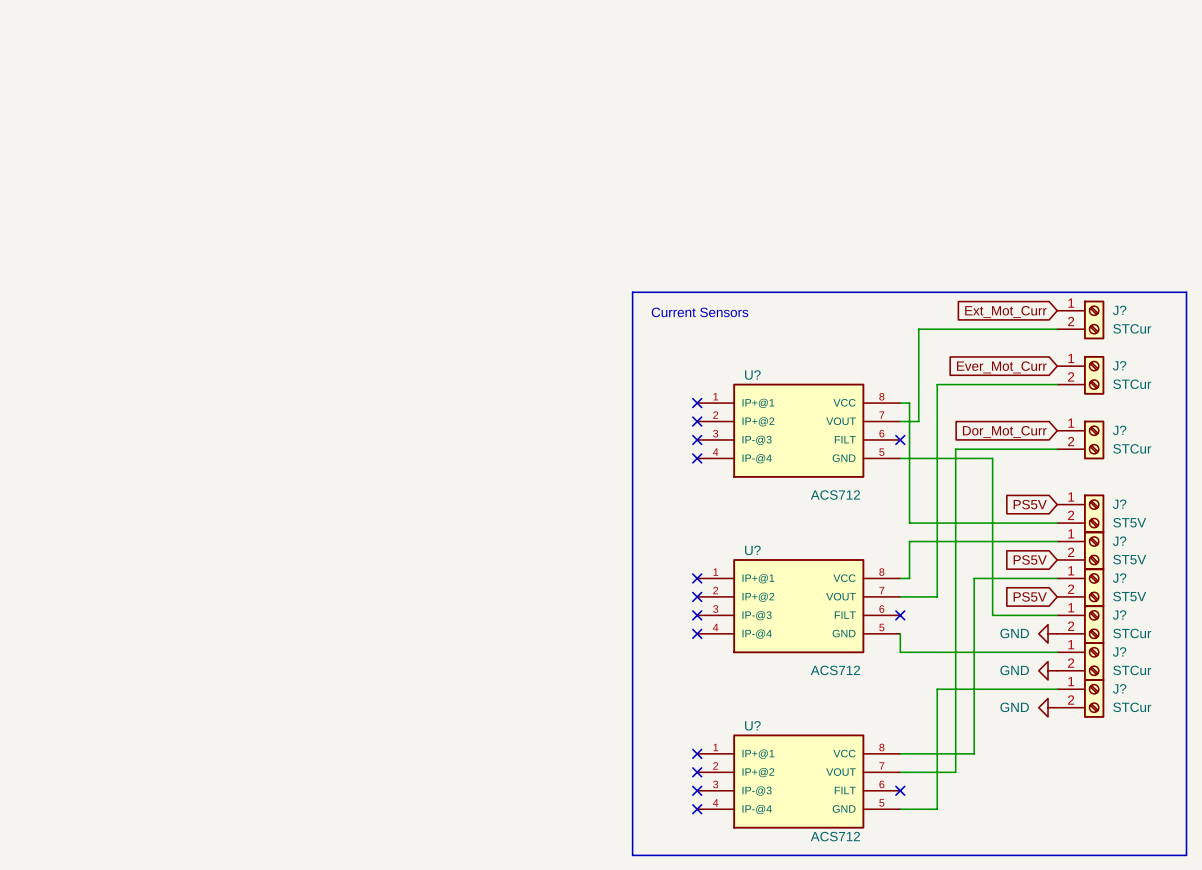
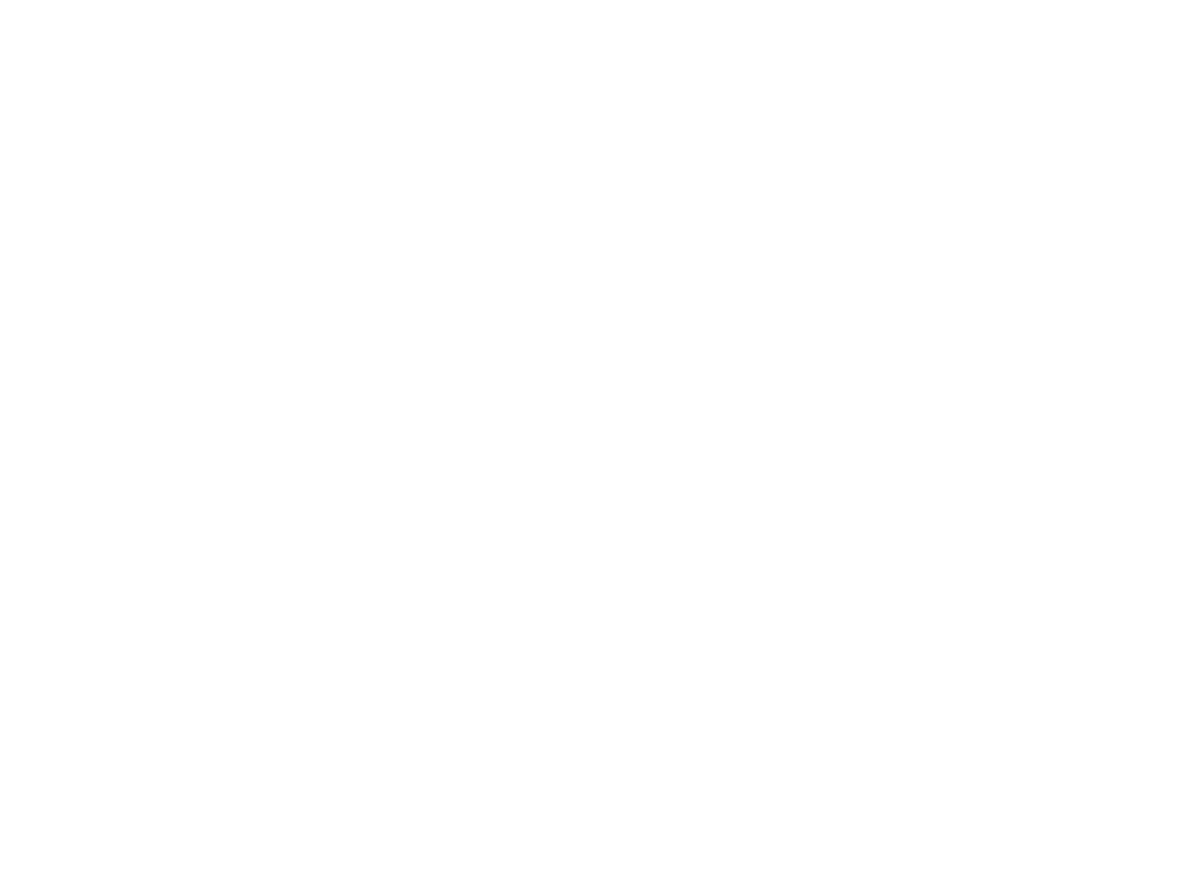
line: (632, 292) (632, 855) (1186, 855) (1186, 292) (632, 292) -> none
text: Current Sensors (700, 312) -> none
global label: Ext_Mot_Curr (1005, 312) -> none
J?: STCur (1080, 319) -> none
wire: (1057, 329) (918, 329) (918, 421) (900, 421) -> none
global label: Ever_Mot_Curr (1001, 367) -> none
J?: STCur (1080, 375) -> none
wire: (1057, 384) (937, 384) (937, 596) (900, 596) -> none
no-connect mark: (697, 403) -> none
wire: (900, 403) (909, 403) (909, 523) (1057, 523) -> none
no-connect mark: (697, 421) -> none
U?: ACS712 (798, 430) -> none
global label: Dor_Mot_Curr (1004, 432) -> none
no-connect mark: (697, 439) -> none
no-connect mark: (900, 439) -> none
J?: STCur (1080, 439) -> none
wire: (1057, 449) (955, 449) (955, 772) (900, 772) -> none
no-connect mark: (697, 458) -> none
wire: (900, 458) (992, 458) (992, 615) (1057, 615) -> none
global label: PS5V (1030, 504) -> none
J?: ST5V (1080, 513) -> none
wire: (1057, 541) (909, 541) (909, 578) (900, 578) -> none
J?: ST5V (1080, 550) -> none
global label: PS5V (1030, 559) -> none
no-connect mark: (697, 578) -> none
wire: (1057, 578) (974, 578) (974, 753) (900, 753) -> none
J?: ST5V (1080, 587) -> none
no-connect mark: (697, 596) -> none
global label: PS5V (1030, 596) -> none
U?: ACS712 (798, 606) -> none
no-connect mark: (697, 615) -> none
no-connect mark: (900, 615) -> none
J?: STCur (1080, 624) -> none
no-connect mark: (697, 633) -> none
wire: (900, 633) (900, 652) (1057, 652) -> none
power symbol: GND (1048, 633) -> none
J?: STCur (1080, 661) -> none
power symbol: GND (1048, 670) -> none
wire: (1057, 689) (937, 689) (937, 809) (900, 809) -> none
J?: STCur (1080, 698) -> none
power symbol: GND (1048, 707) -> none
no-connect mark: (697, 753) -> none
no-connect mark: (697, 772) -> none
U?: ACS712 (798, 781) -> none
no-connect mark: (697, 790) -> none
no-connect mark: (900, 790) -> none
no-connect mark: (697, 809) -> none

